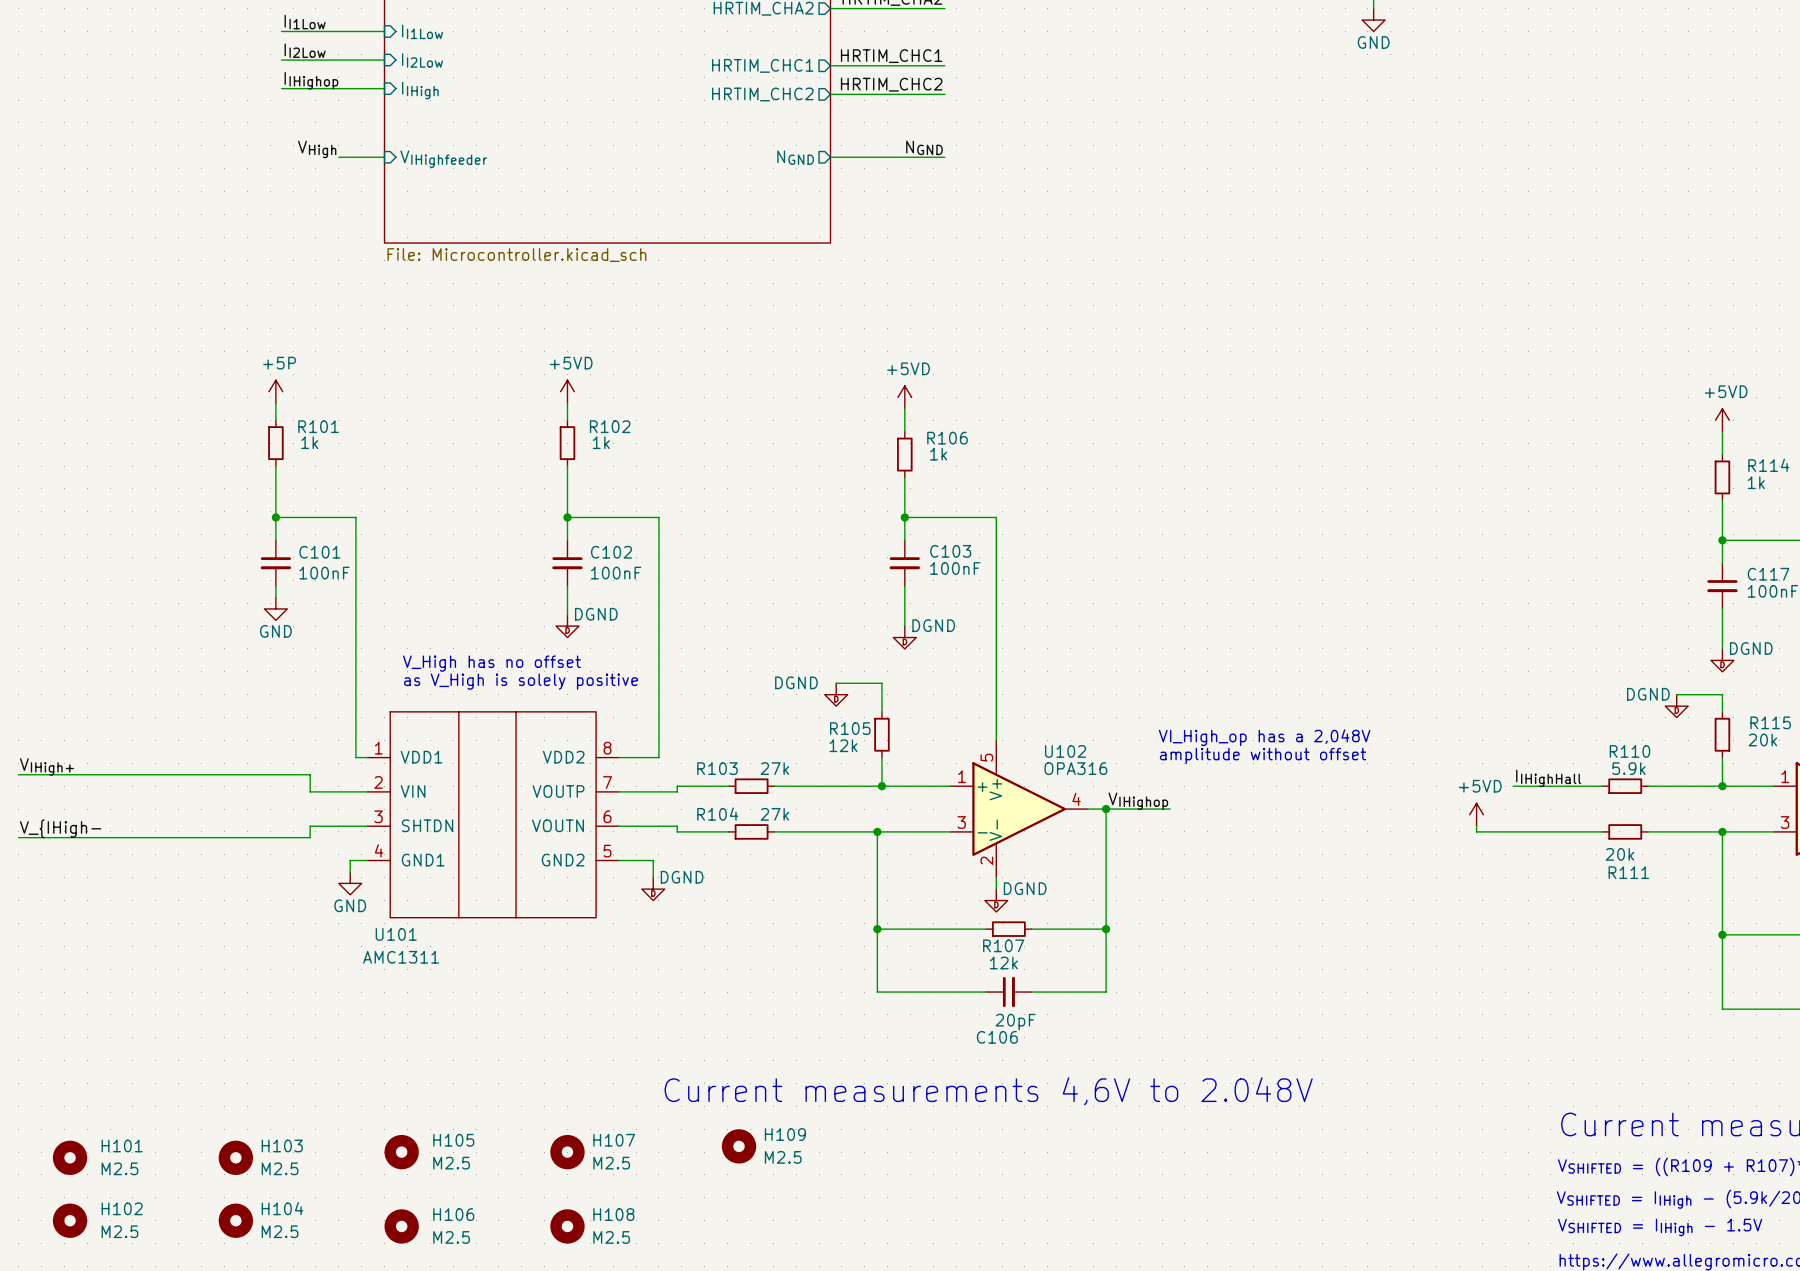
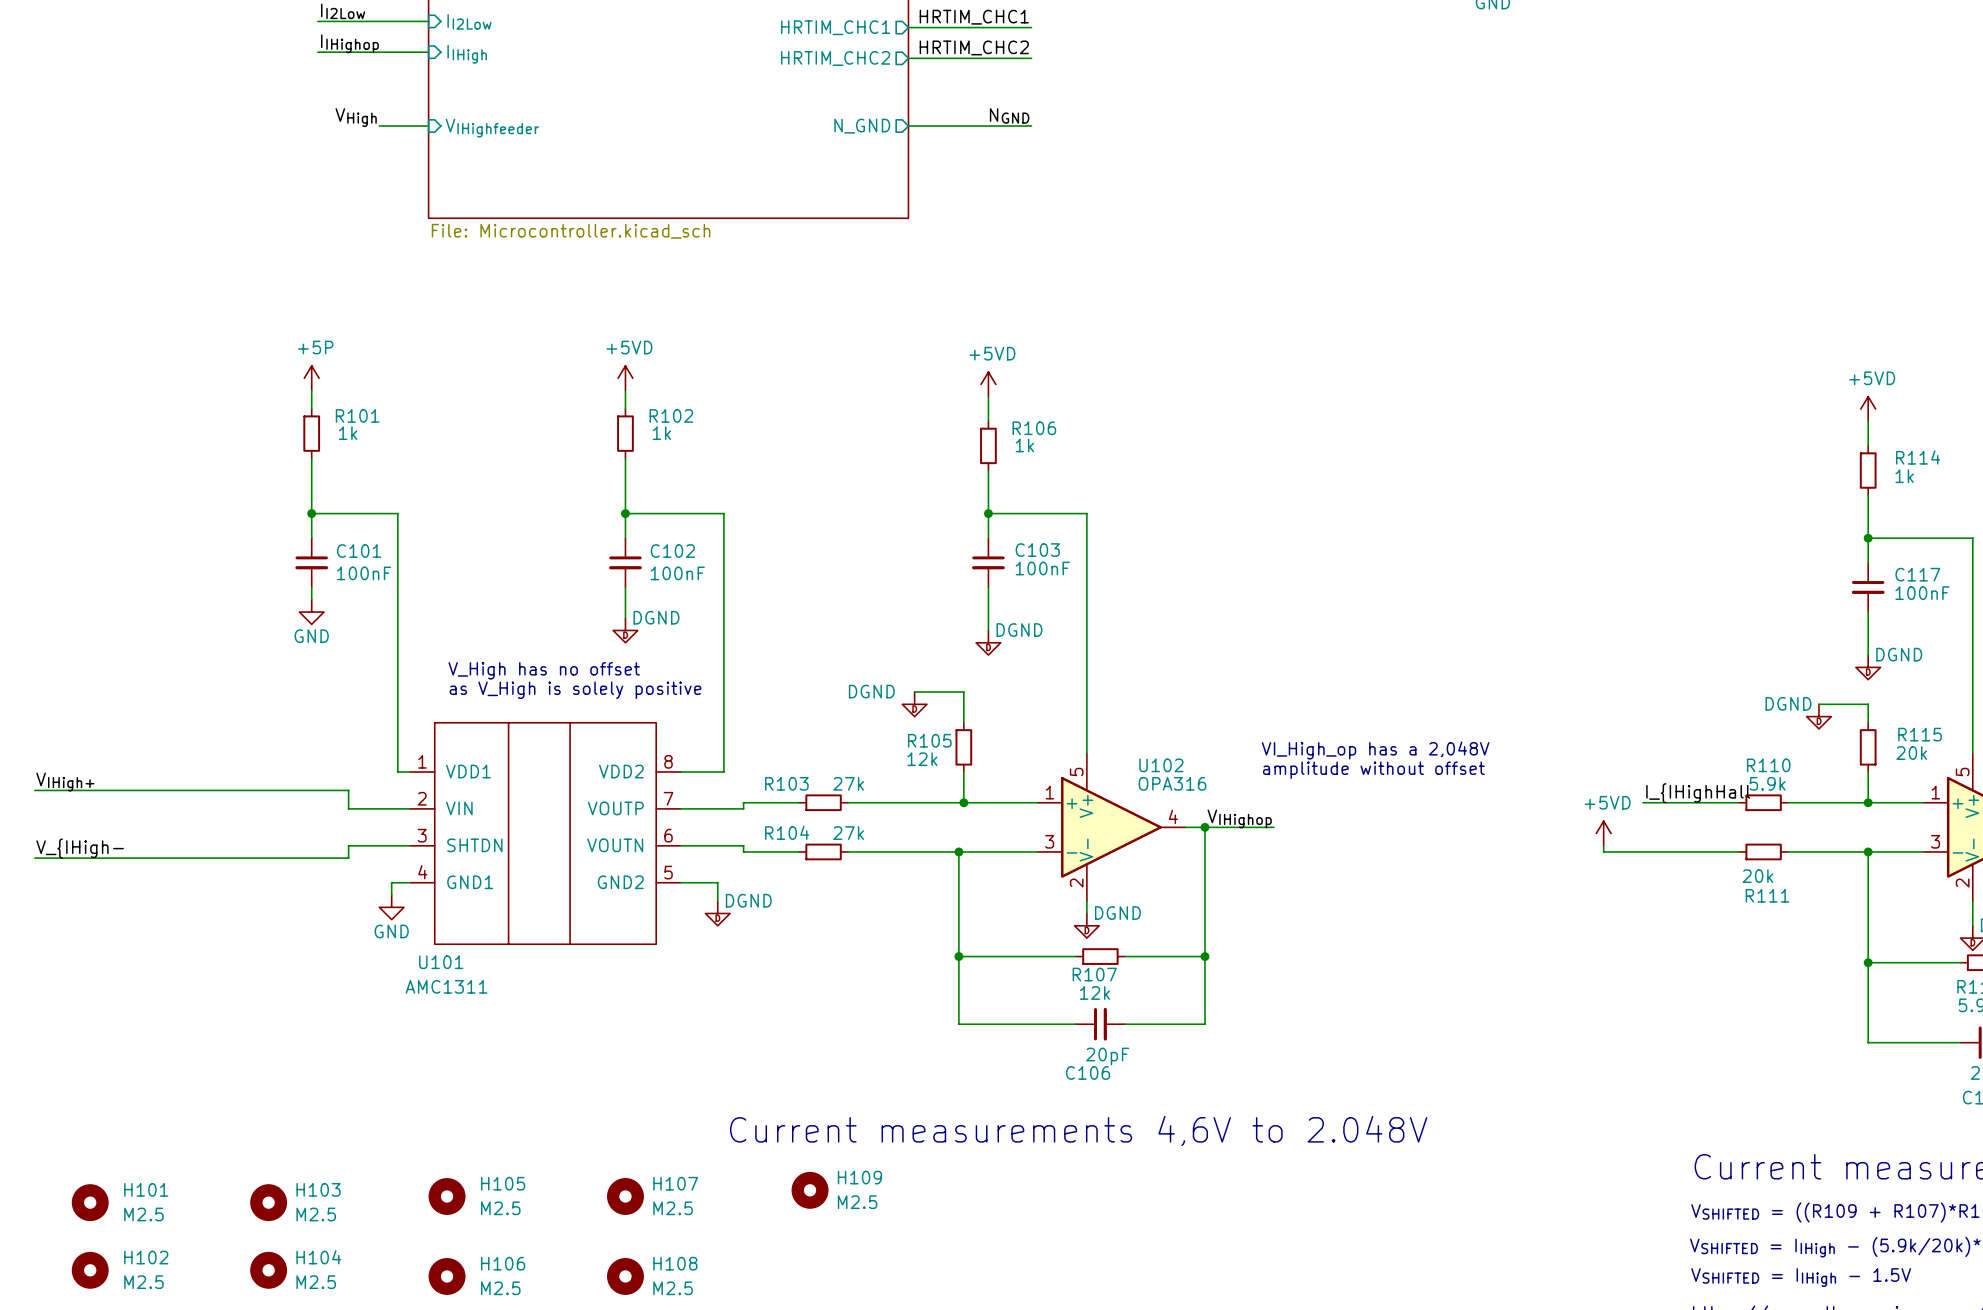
sheet pin: NGND (795, 157) -> N_GND (862, 126)
label: IIHighHall (1548, 778) -> I_{IHighHall (1698, 793)

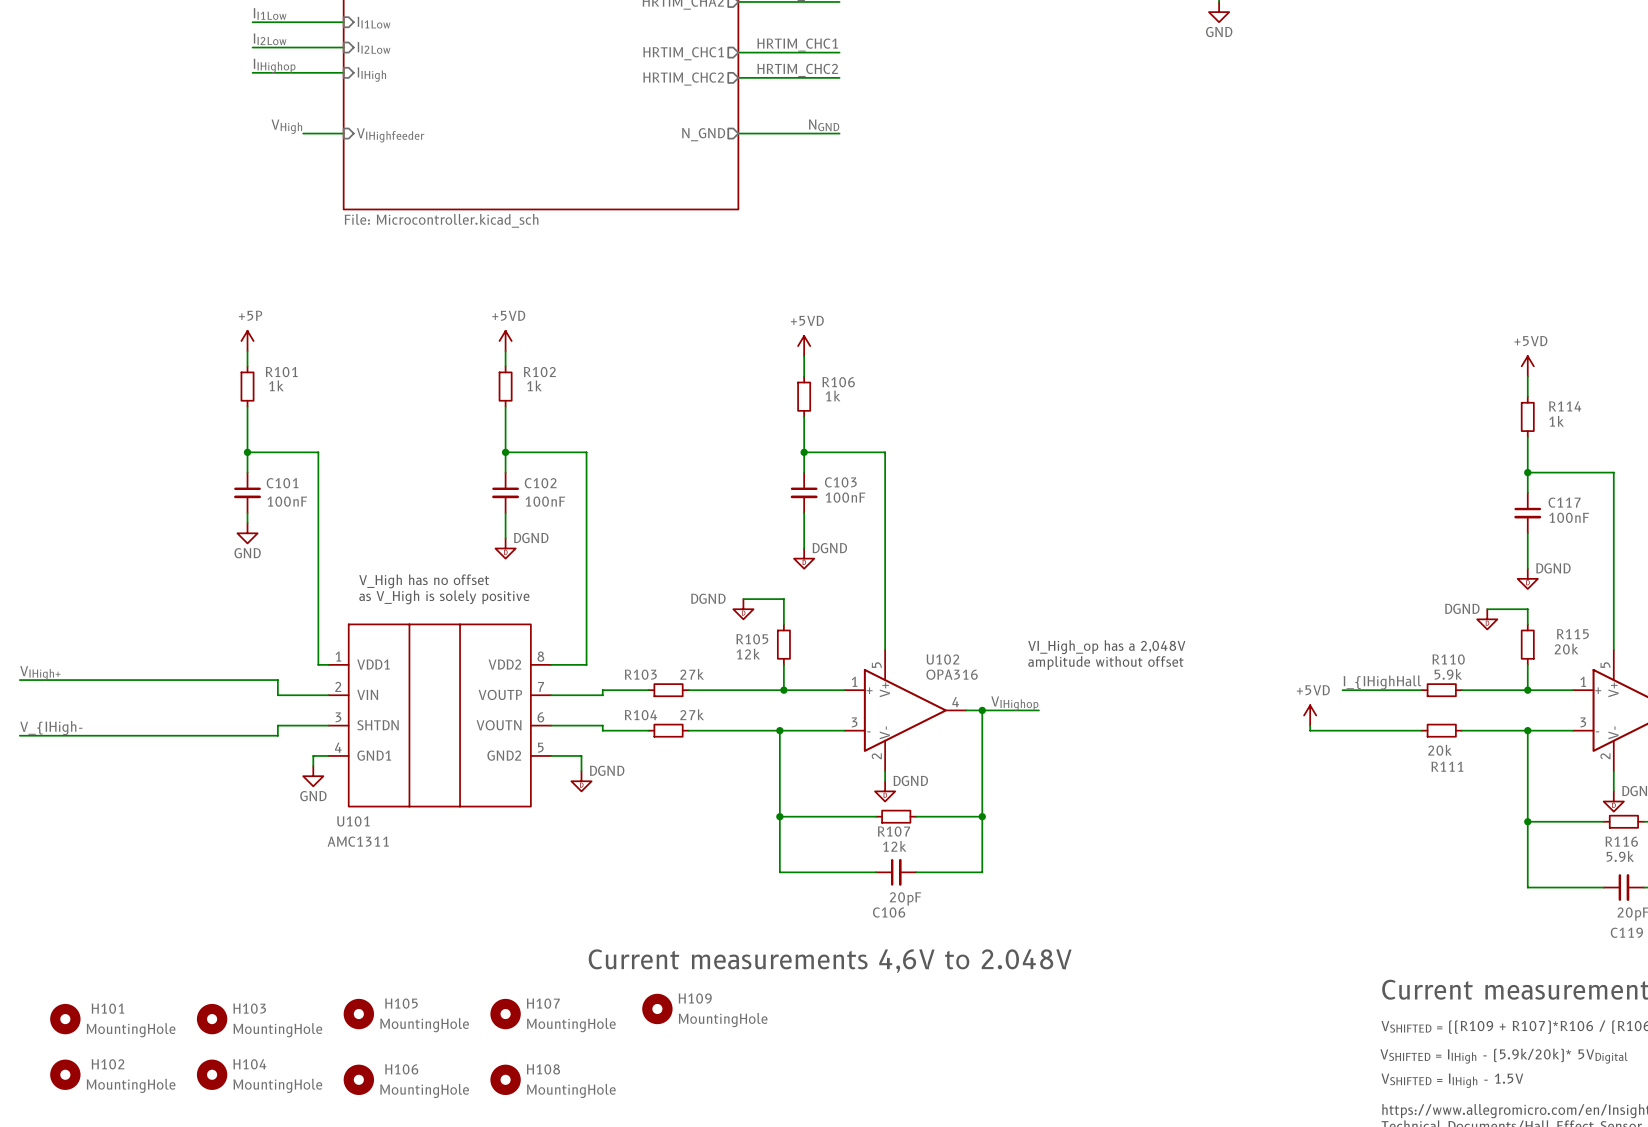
H109 value: M2.5 (857, 1202) -> MountingHole (723, 1020)
H105 value: M2.5 (500, 1208) -> MountingHole (424, 1025)
H107 value: M2.5 (673, 1208) -> MountingHole (571, 1025)
H101 value: M2.5 (143, 1214) -> MountingHole (131, 1030)
H103 value: M2.5 (316, 1214) -> MountingHole (277, 1030)
H102 value: M2.5 (143, 1282) -> MountingHole (131, 1085)
H104 value: M2.5 (316, 1282) -> MountingHole (277, 1085)
H106 value: M2.5 (500, 1288) -> MountingHole (424, 1090)
H108 value: M2.5 (673, 1288) -> MountingHole (571, 1090)

